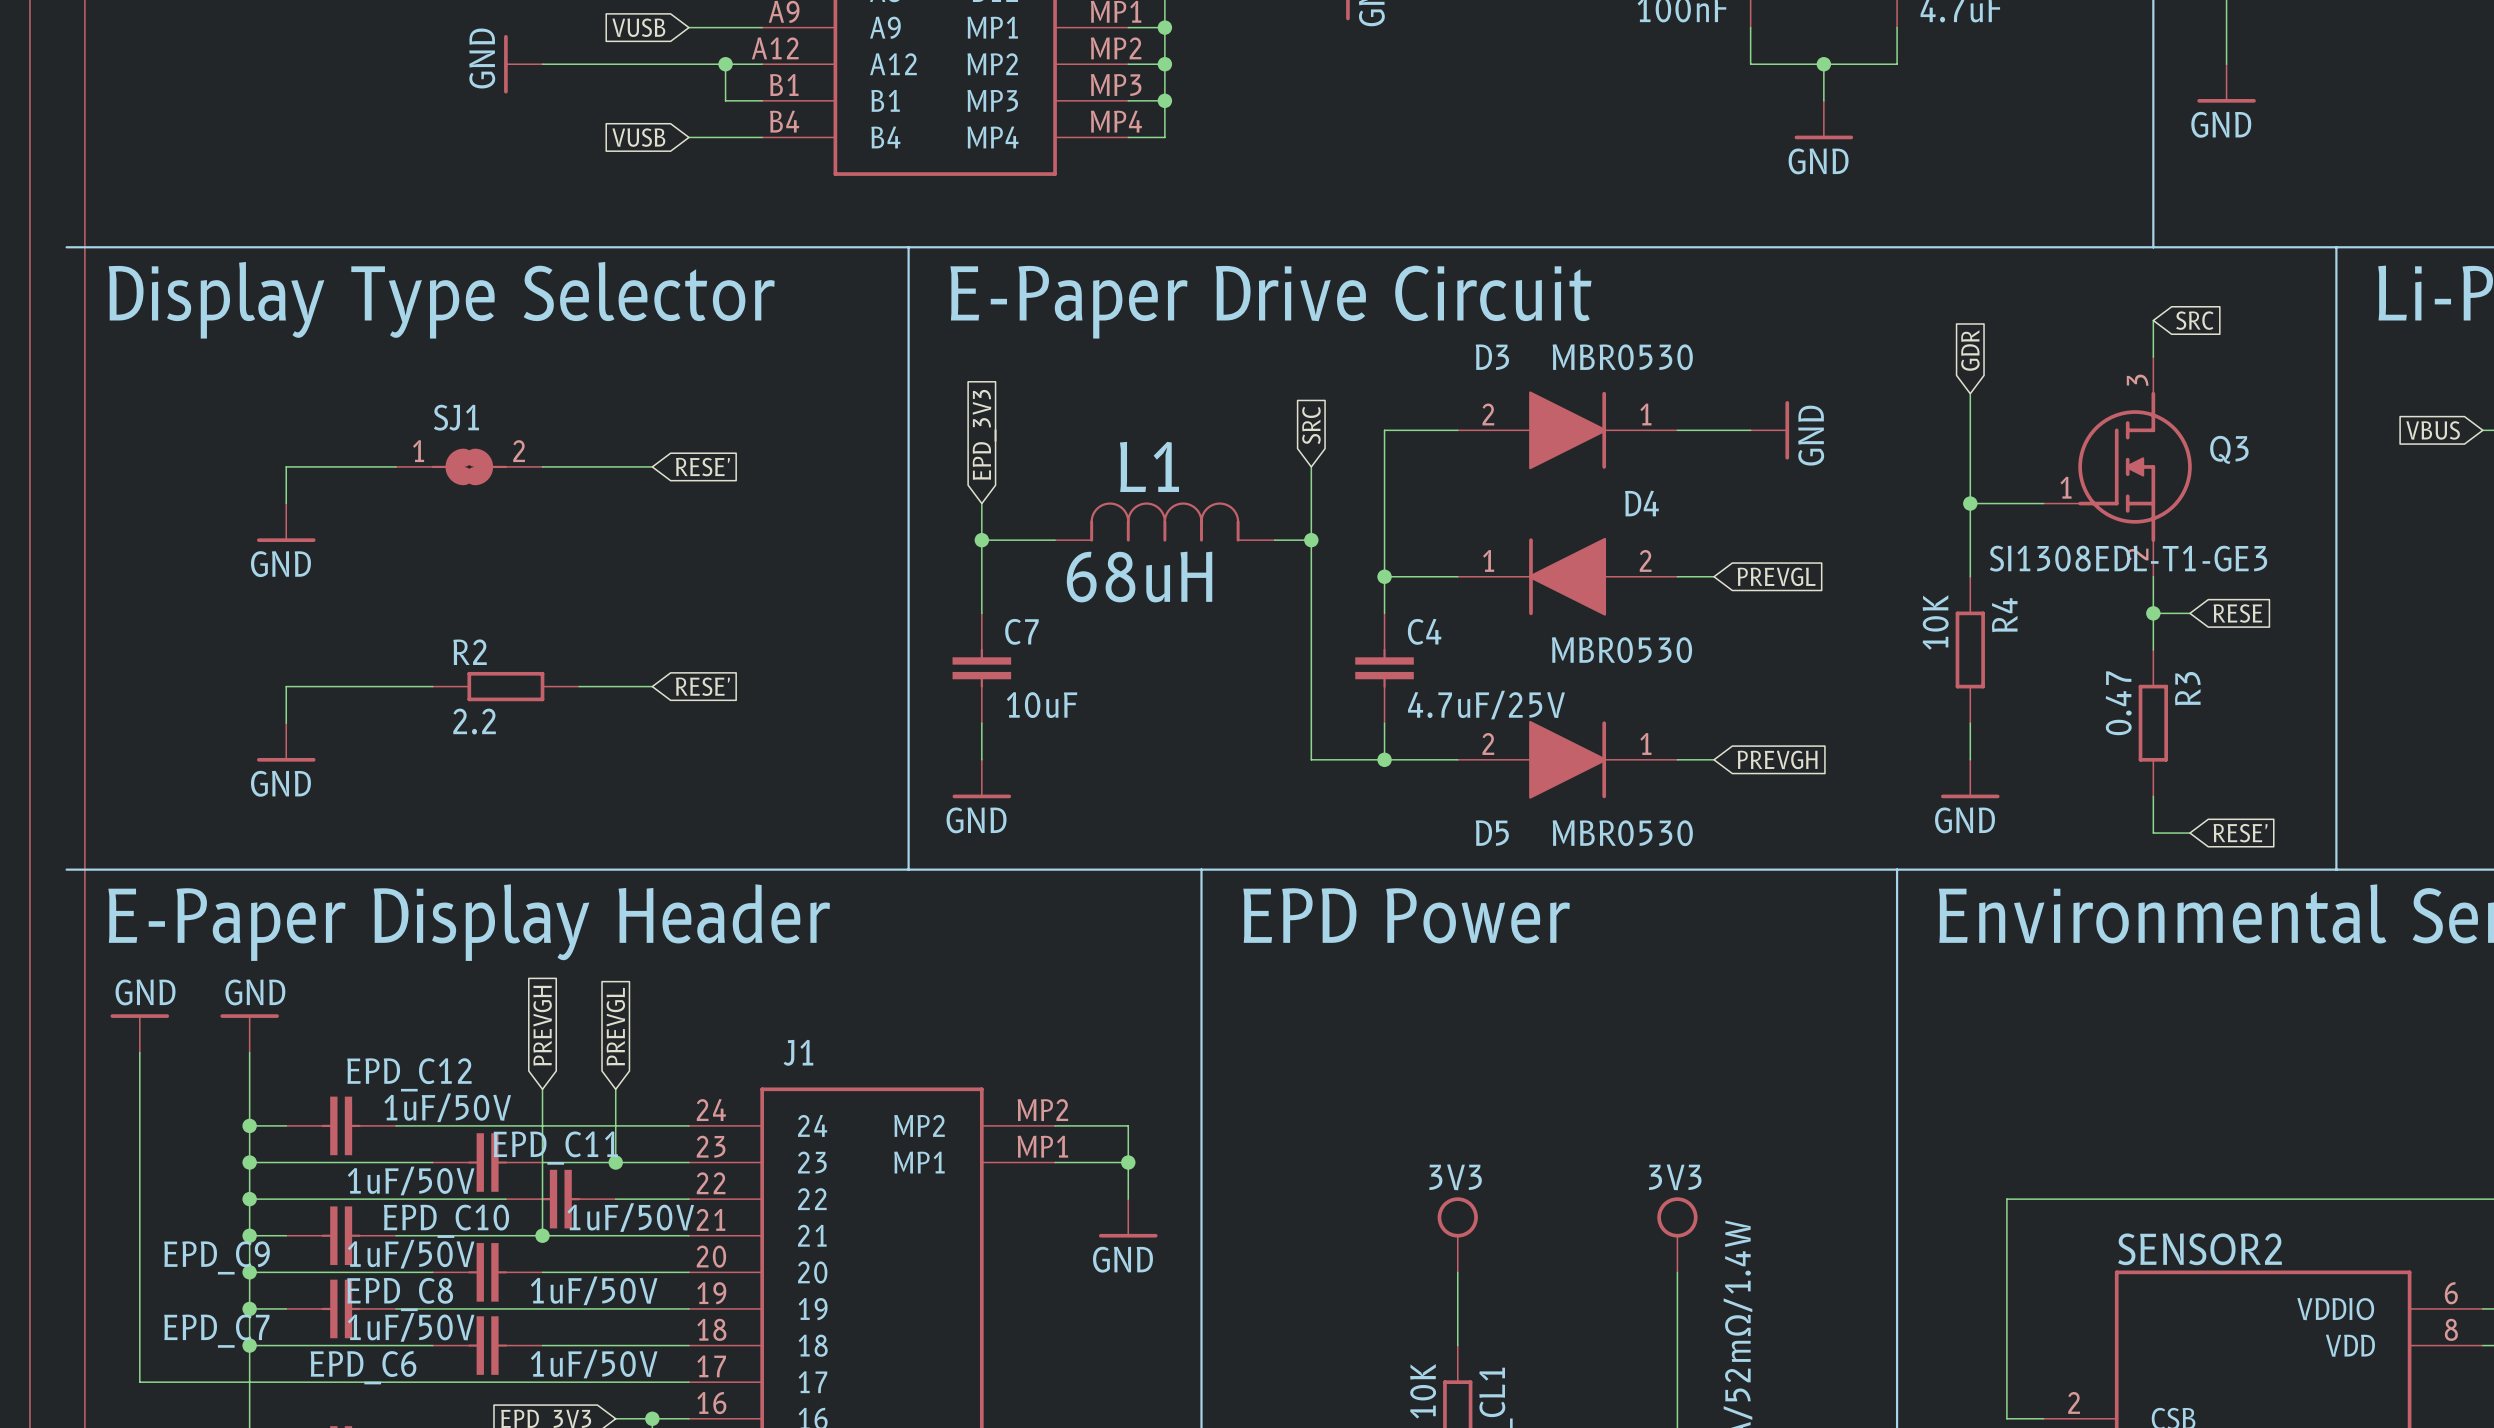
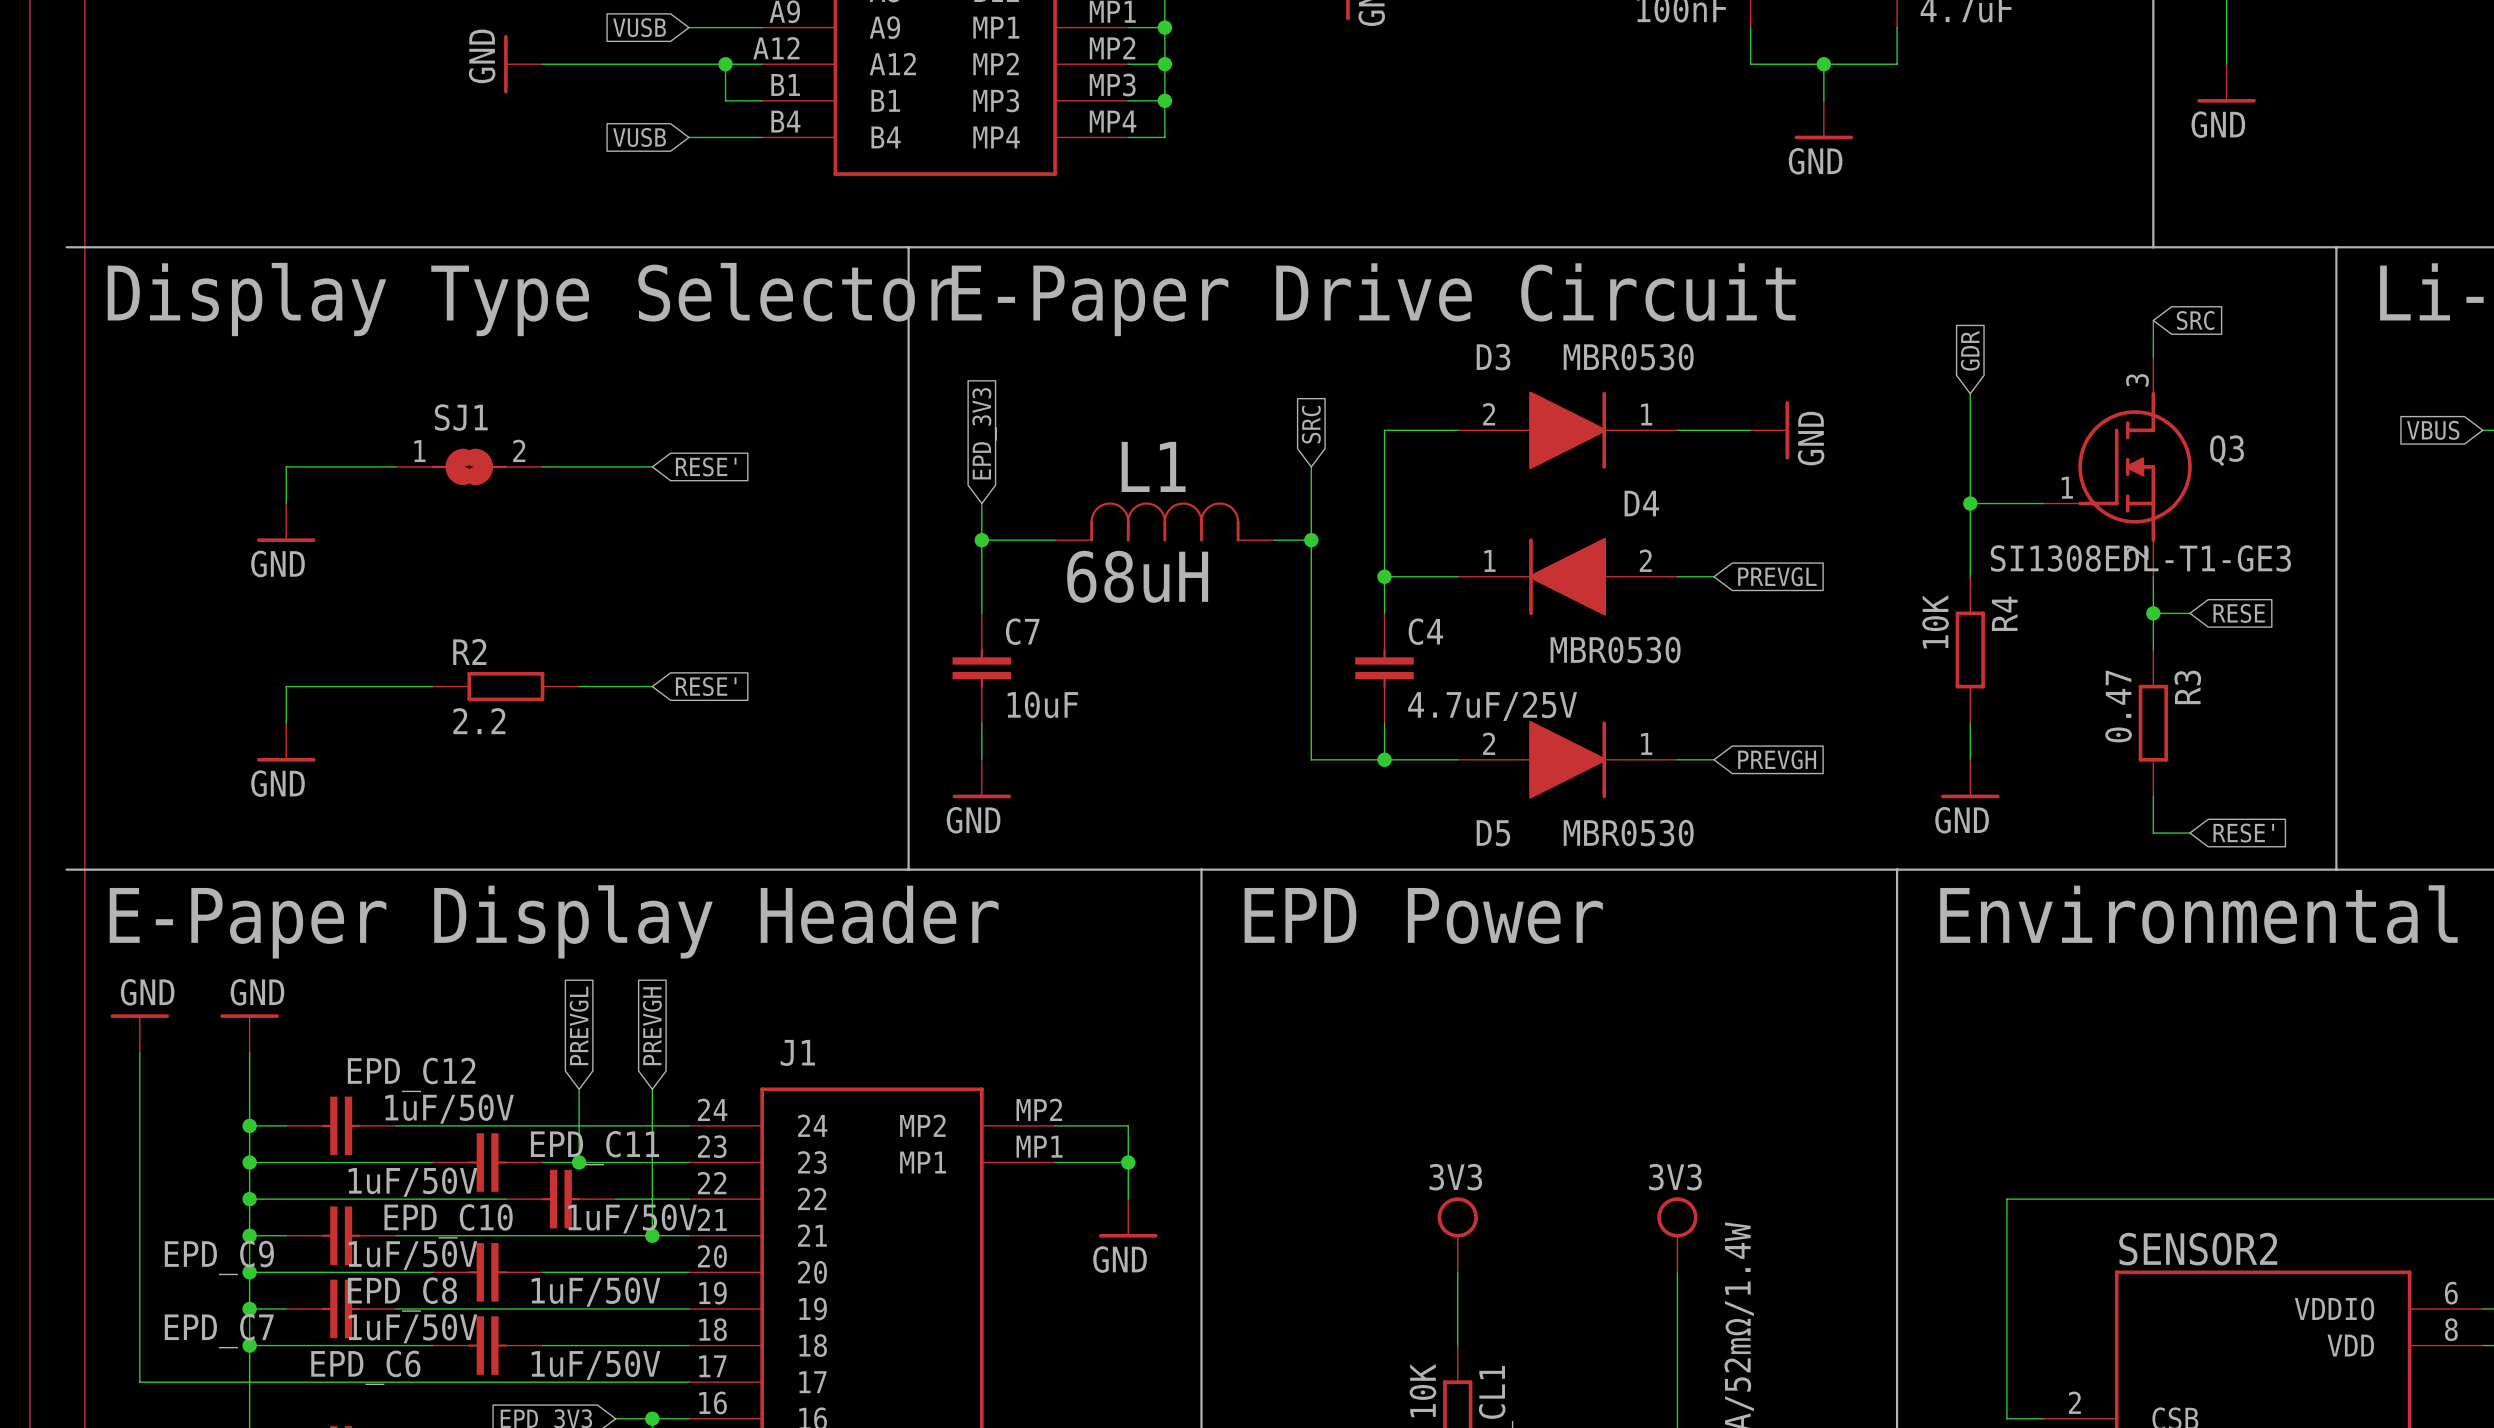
global label position: PREVGH (542, 1025) -> PREVGH (652, 1026)
global label position: PREVGL (615, 1026) -> PREVGL (579, 1025)
wire: (542, 1089) (542, 1235) -> (652, 1089) (652, 1235)
wire: (615, 1089) (615, 1162) -> (579, 1089) (579, 1162)
EPD_C11 name position: EPD_C11 (555, 1148) -> EPD_C11 (594, 1148)
junction position: (615, 1162) -> (579, 1162)
junction: (542, 1235) -> none
junction: none -> (652, 1235)

